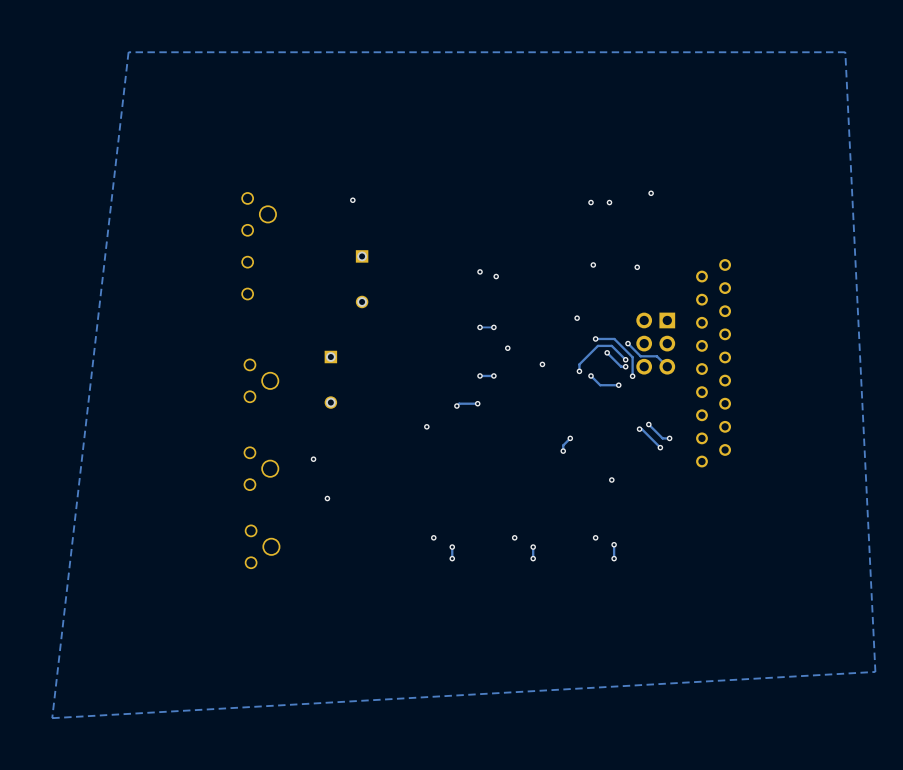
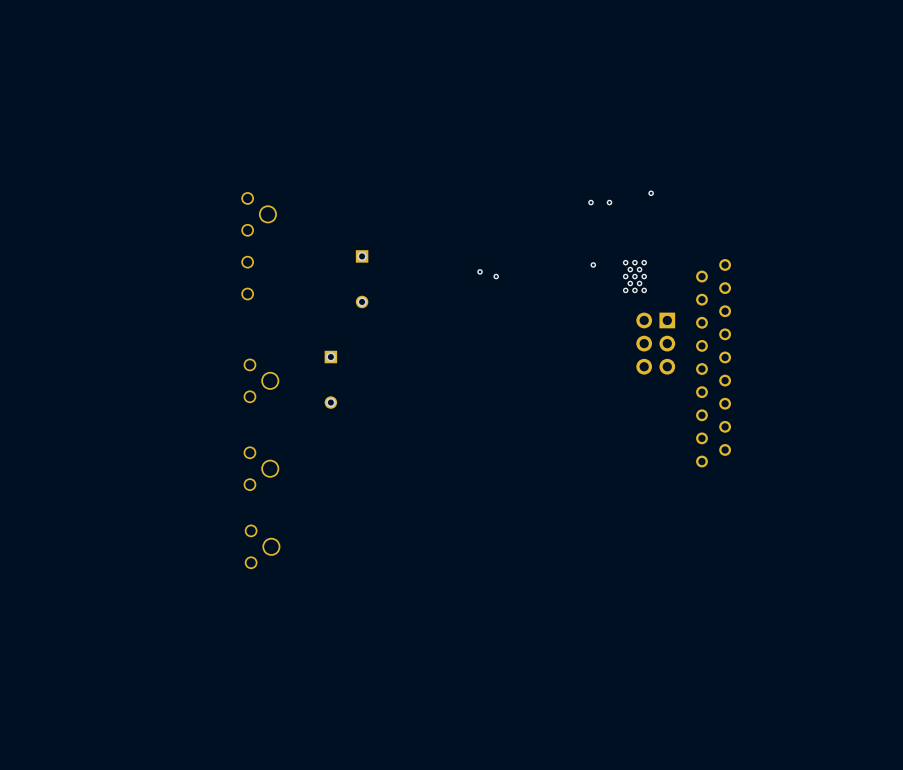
zone outline: (845, 52) (128, 52) (52, 718) (875, 671) (845, 52) -> none
via: (352, 200) -> none
via: none -> (625, 262)
via: none -> (634, 262)
via: none -> (644, 262)
via: (637, 267) -> none
via: none -> (630, 269)
via: none -> (639, 269)
via: none -> (625, 276)
via: none -> (634, 276)
via: none -> (644, 276)
via: none -> (630, 283)
via: none -> (639, 283)
via: none -> (625, 290)
via: none -> (634, 290)
via: none -> (644, 290)
via: (577, 318) -> none
via: (480, 327) -> none
track: (493, 327) (480, 327) -> none
via: (493, 327) -> none
track: (595, 338) (614, 338) (632, 357) (632, 376) -> none
via: (595, 338) -> none
track: (627, 343) (640, 356) (656, 356) (667, 366) -> none
via: (627, 343) -> none
via: (507, 348) -> none
track: (607, 352) (621, 366) (625, 366) -> none
via: (607, 352) -> none
track: (625, 359) (611, 345) (597, 345) (579, 364) (579, 371) -> none
via: (625, 359) -> none
via: (542, 364) -> none
via: (625, 366) -> none
via: (579, 371) -> none
via: (480, 375) -> none
track: (493, 375) (480, 375) -> none
via: (493, 375) -> none
track: (591, 375) (600, 385) (618, 385) -> none
via: (591, 375) -> none
via: (632, 376) -> none
via: (618, 385) -> none
track: (477, 403) (459, 403) (456, 406) -> none
via: (477, 403) -> none
via: (456, 406) -> none
track: (648, 424) (662, 438) (669, 438) -> none
via: (648, 424) -> none
via: (426, 426) -> none
track: (639, 429) (641, 429) (660, 447) -> none
via: (639, 429) -> none
track: (570, 438) (563, 445) (563, 451) -> none
via: (570, 438) -> none
via: (669, 438) -> none
via: (660, 447) -> none
via: (563, 451) -> none
via: (313, 459) -> none
via: (611, 480) -> none
via: (327, 498) -> none
via: (433, 537) -> none
via: (514, 537) -> none
via: (595, 537) -> none
track: (614, 544) (614, 558) -> none
via: (614, 544) -> none
track: (452, 547) (452, 558) -> none
via: (452, 547) -> none
track: (533, 547) (533, 558) -> none
via: (533, 547) -> none
via: (452, 558) -> none
via: (533, 558) -> none
via: (614, 558) -> none

